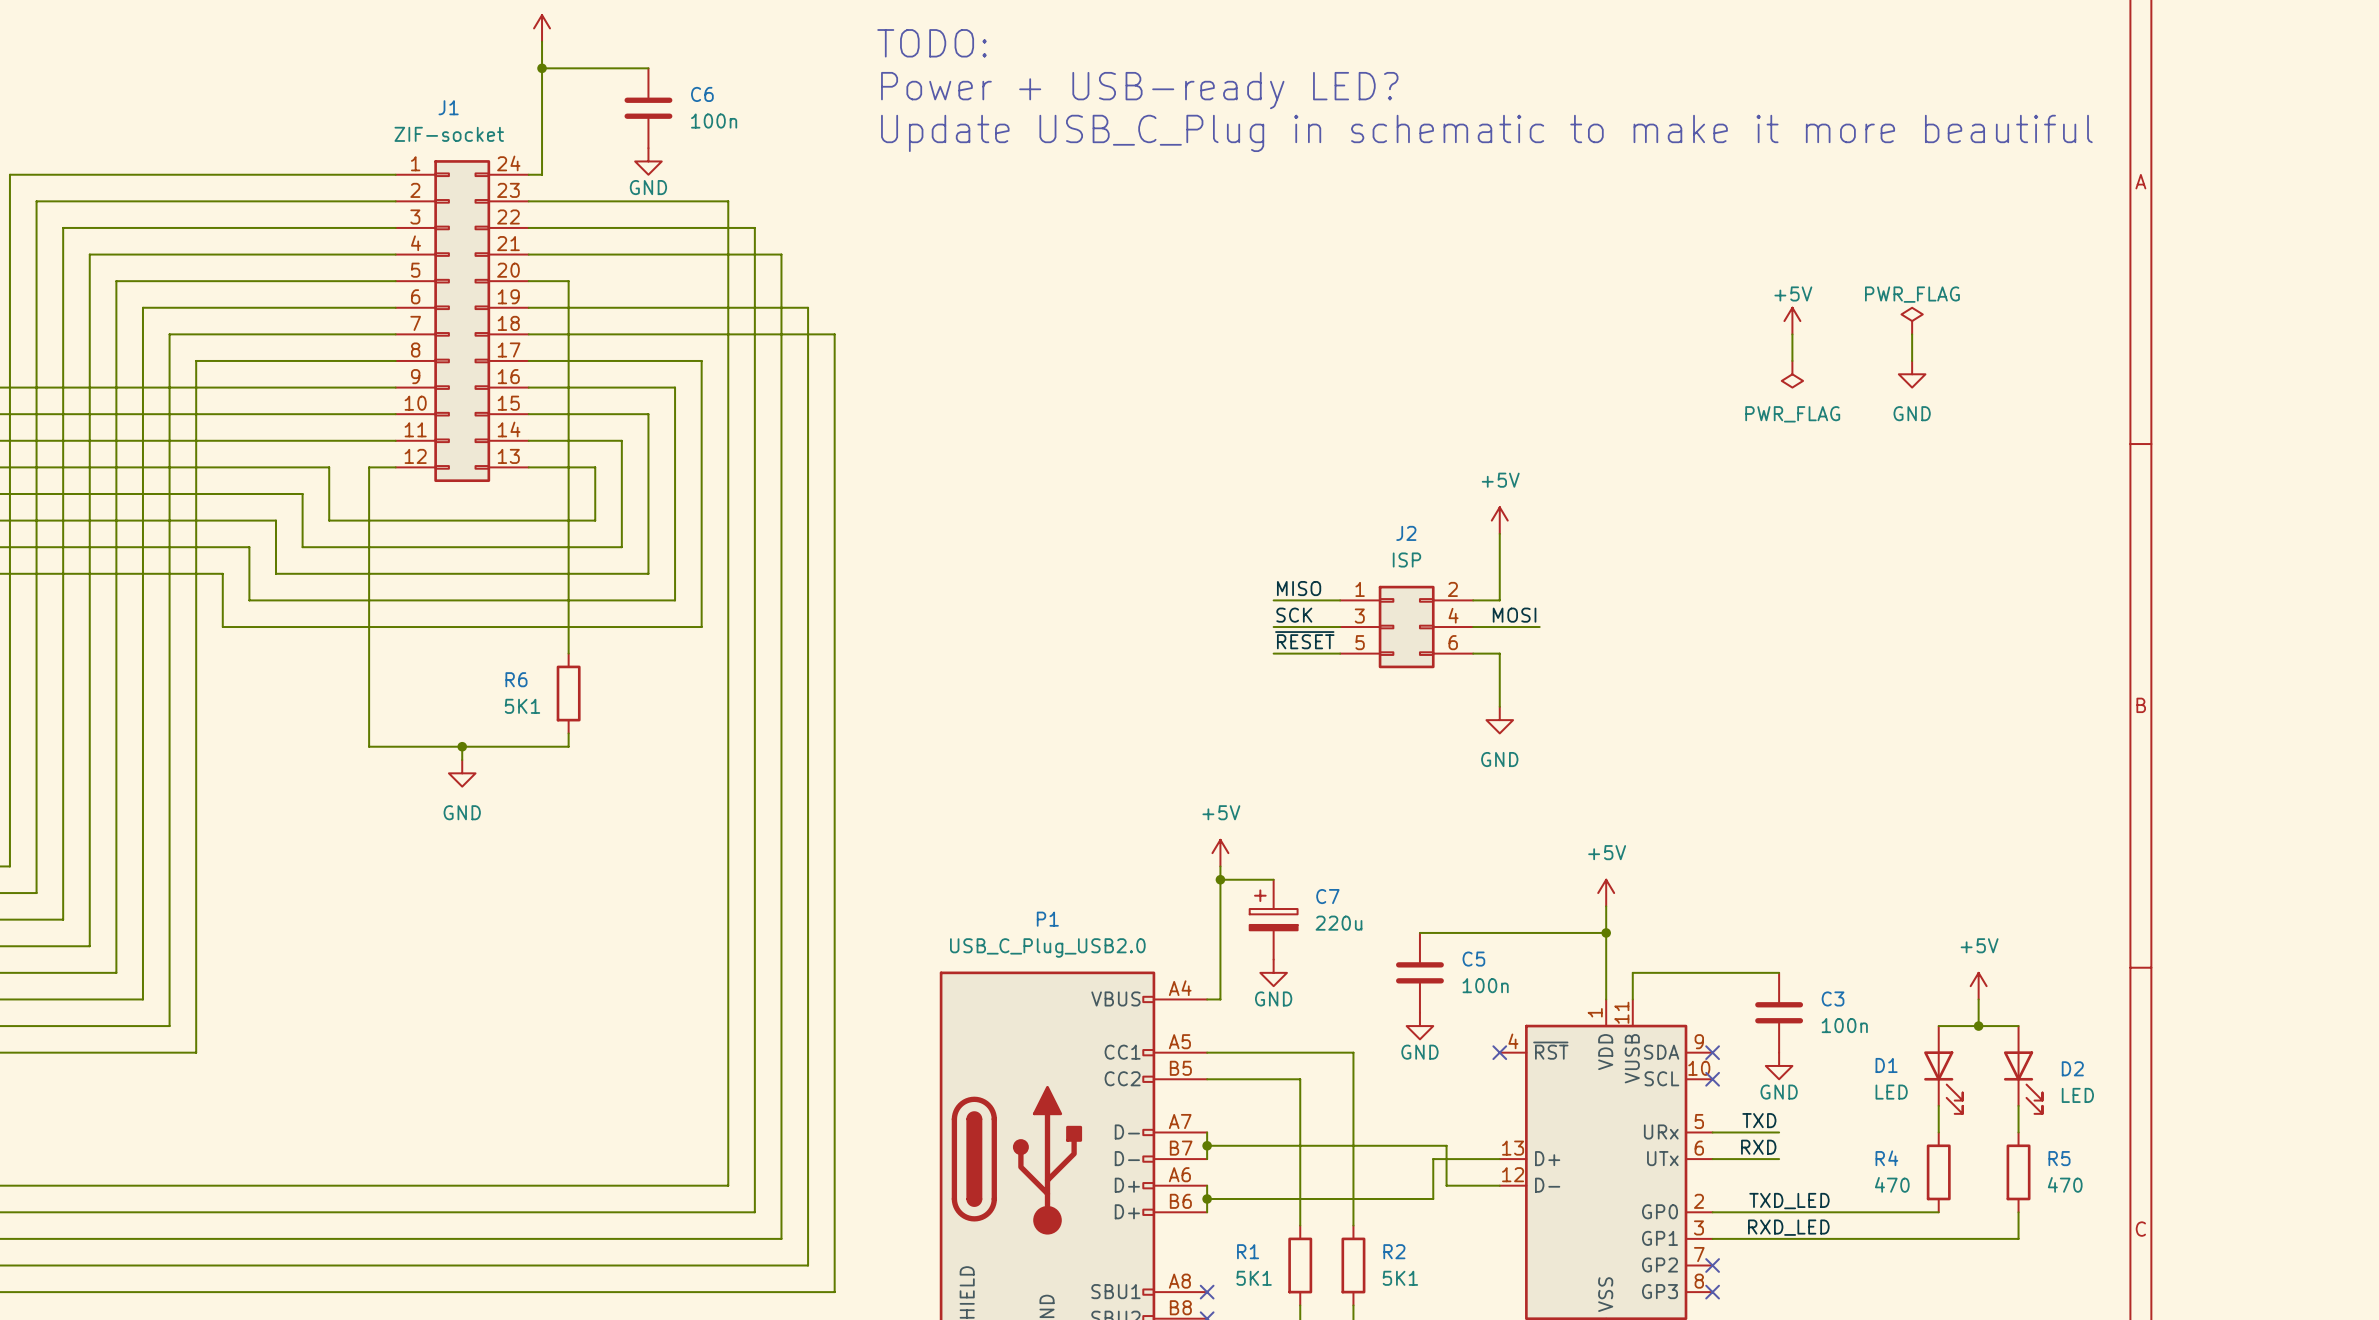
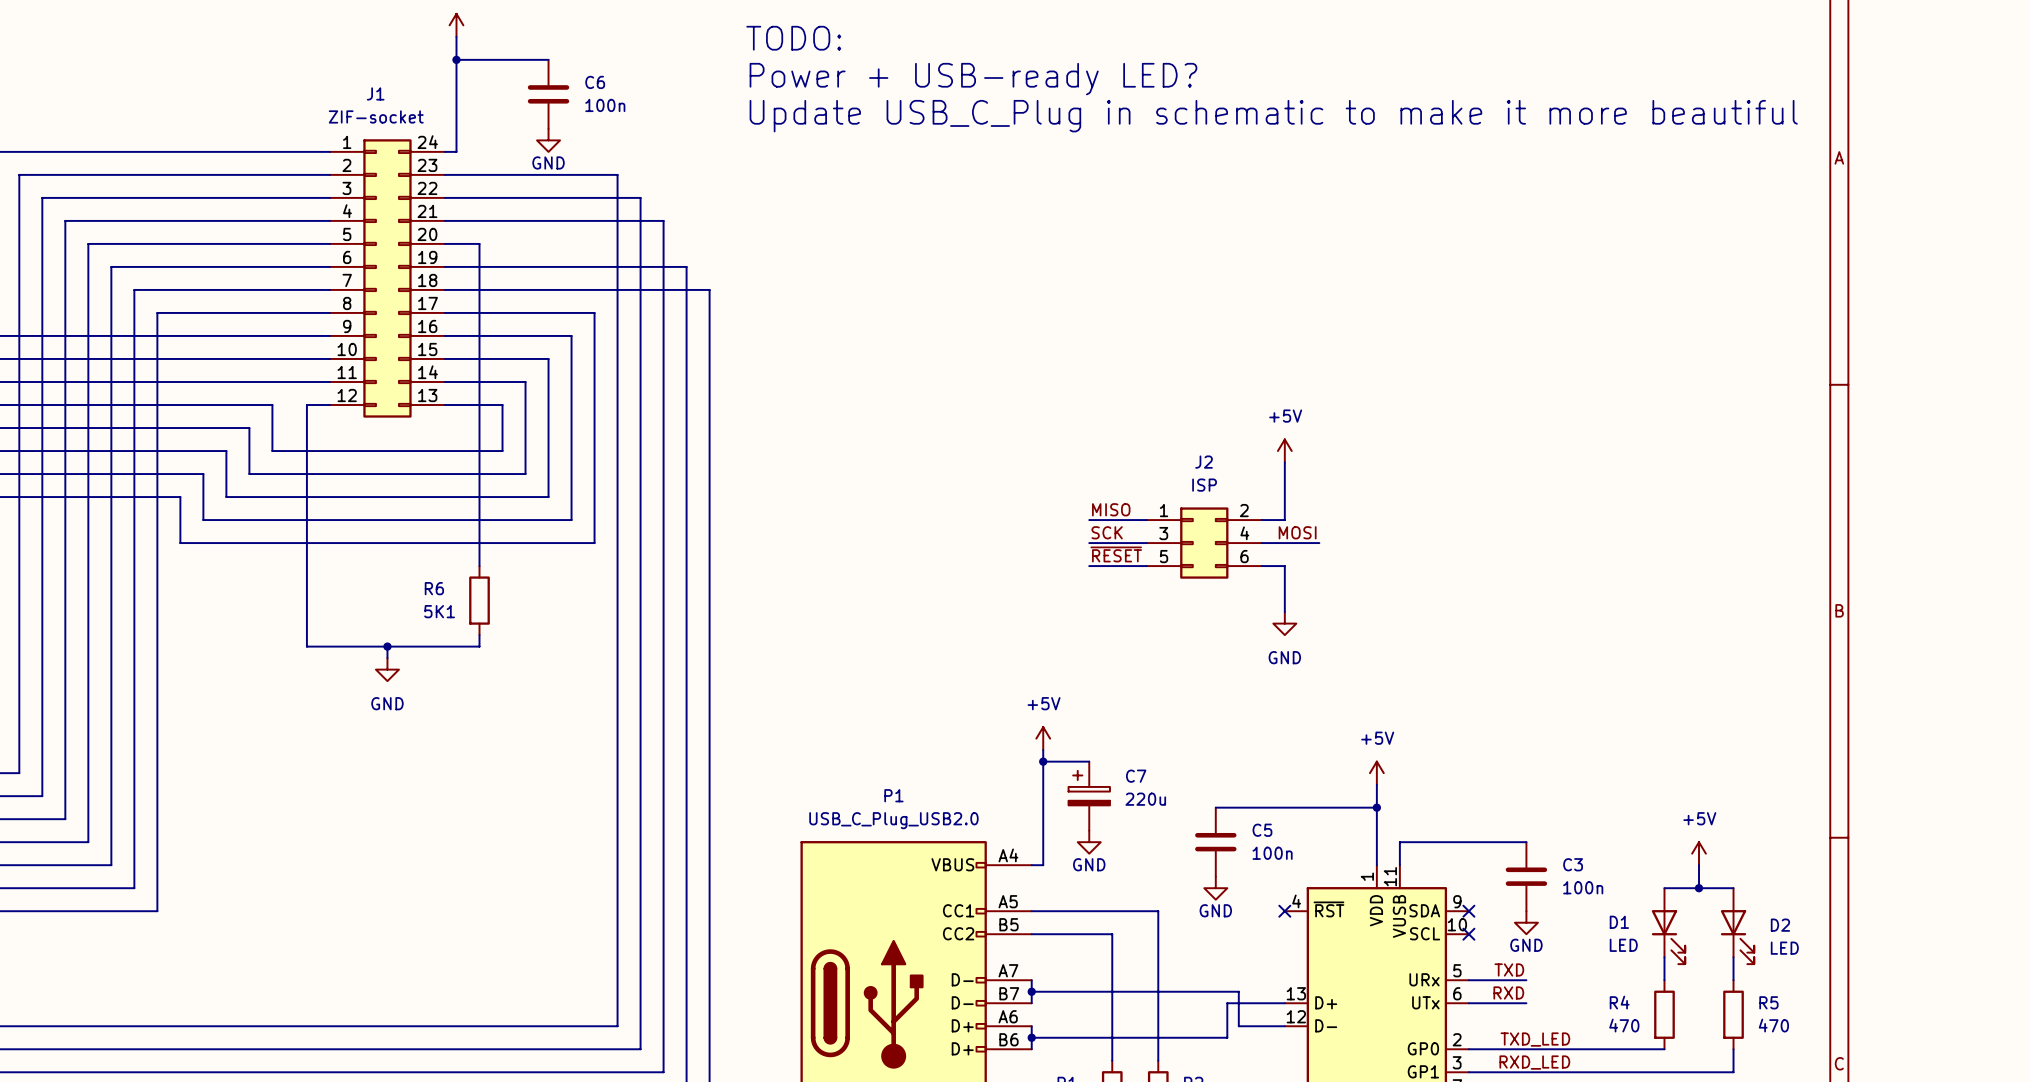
power symbol: +5V (1792, 321) -> none
power symbol: PWR_FLAG (1912, 321) -> none
wire: (1792, 334) (1792, 360) -> none
wire: (1912, 334) (1912, 360) -> none
power symbol: PWR_FLAG (1792, 374) -> none
power symbol: GND (1912, 374) -> none

